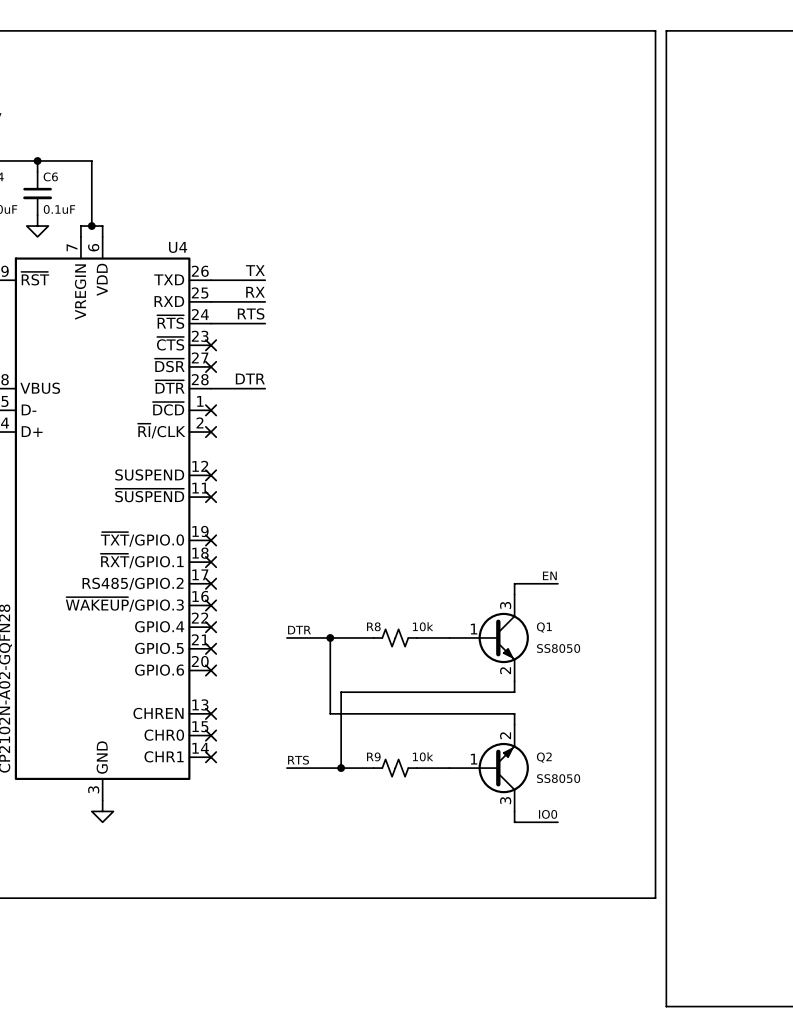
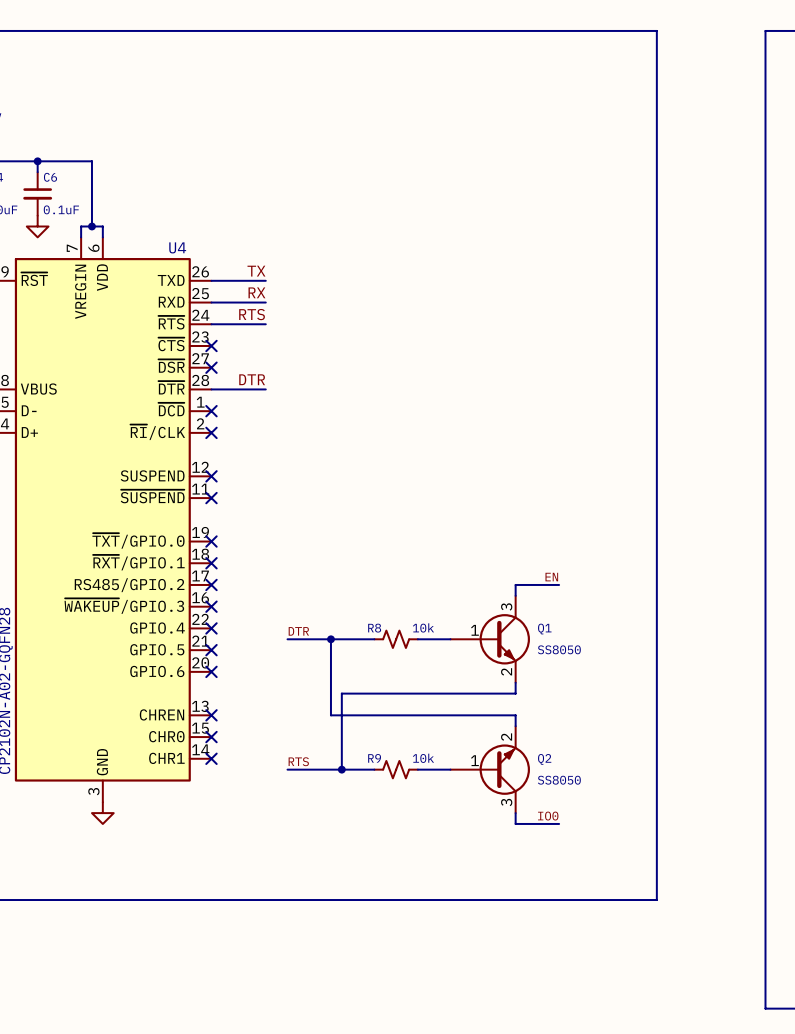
line: (763, 30) (666, 30) (666, 1006) (763, 1006) -> (765, 30) (765, 1008)

